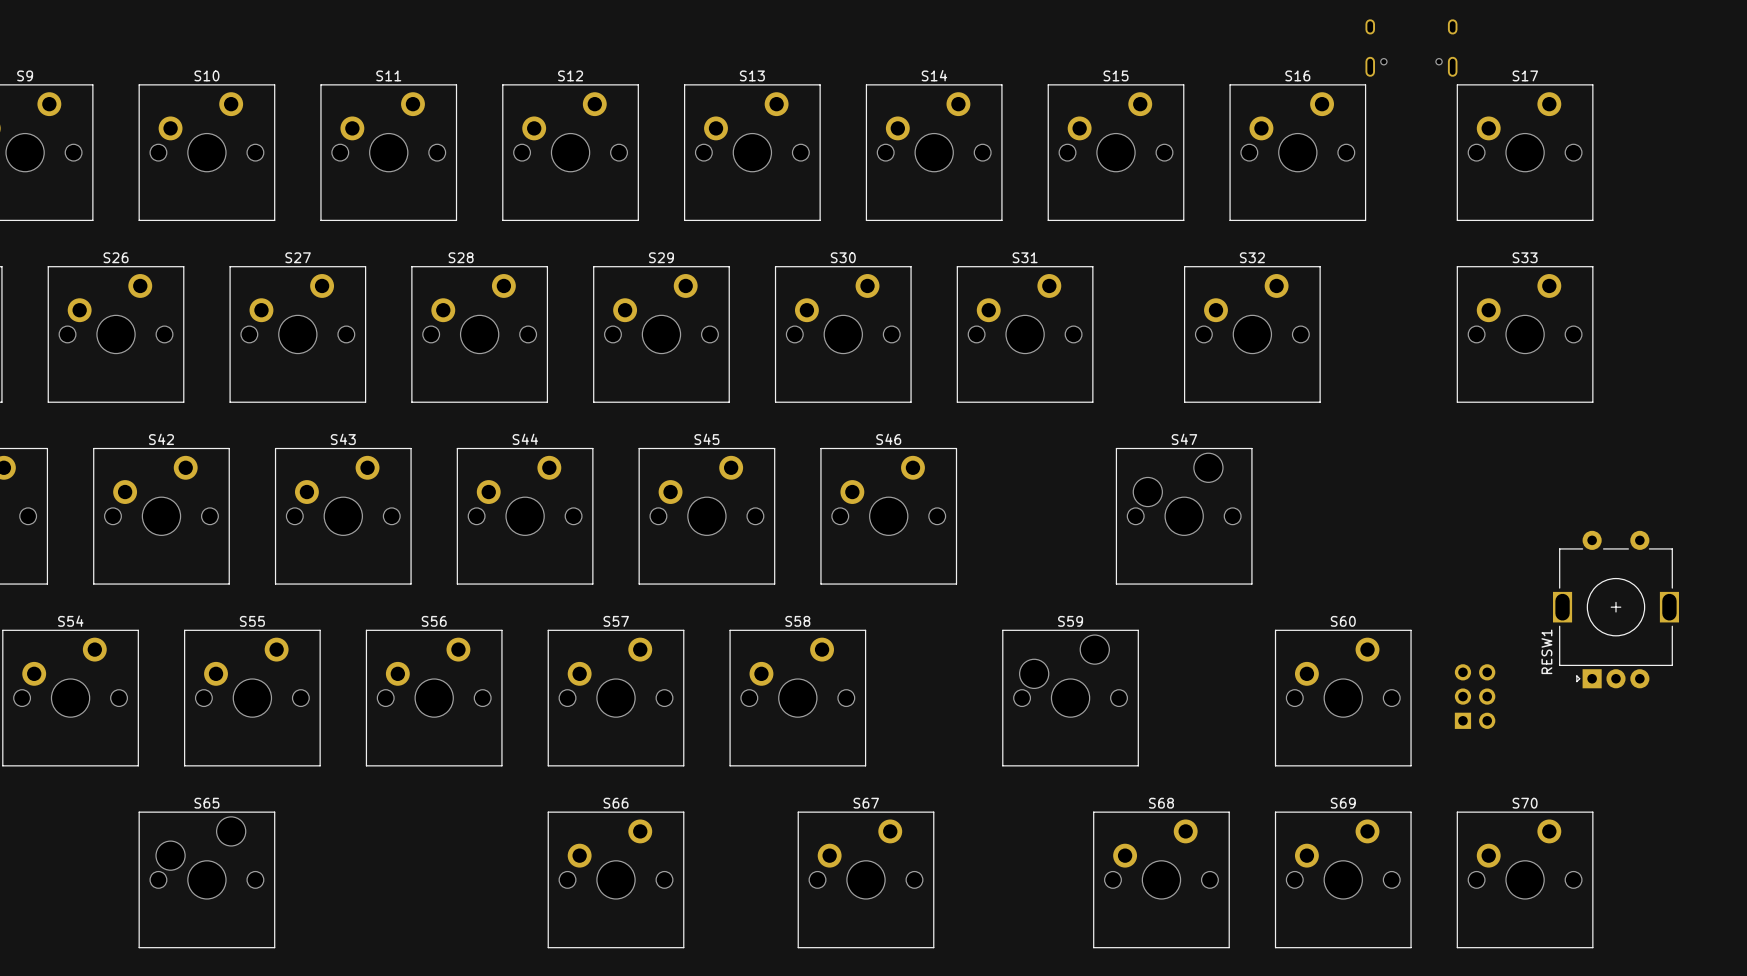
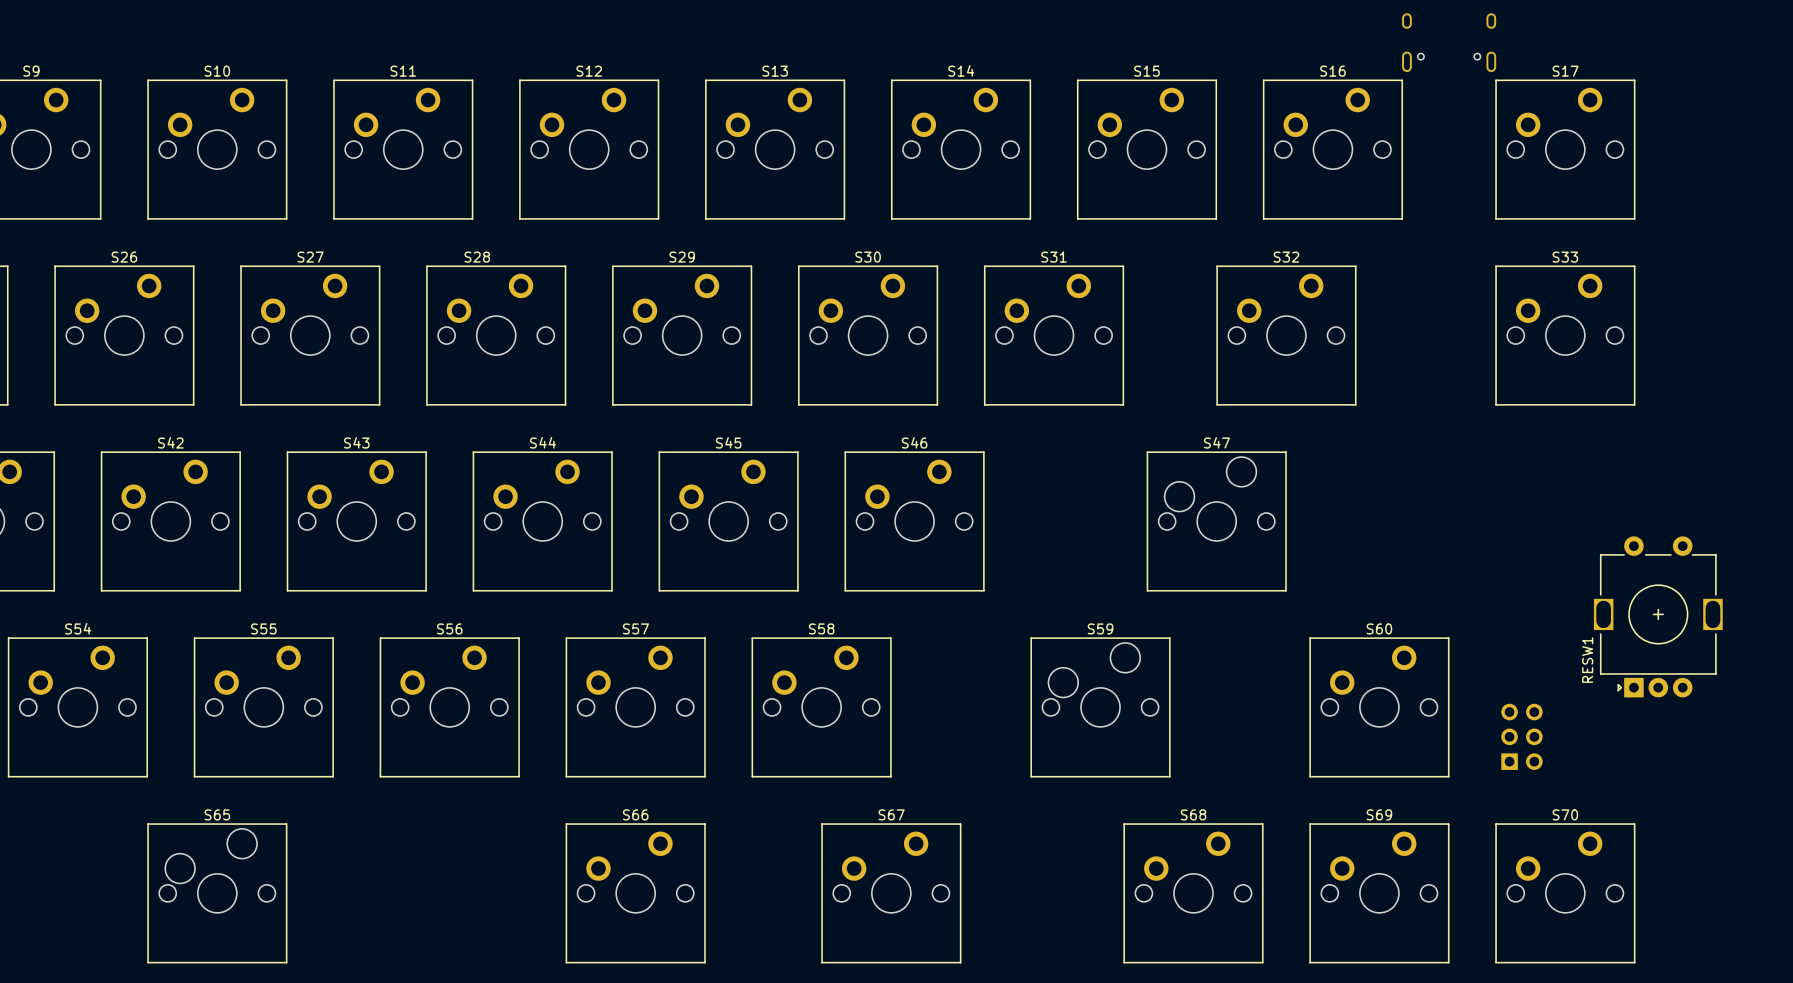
part position: (1475, 696) -> (1521, 736)

